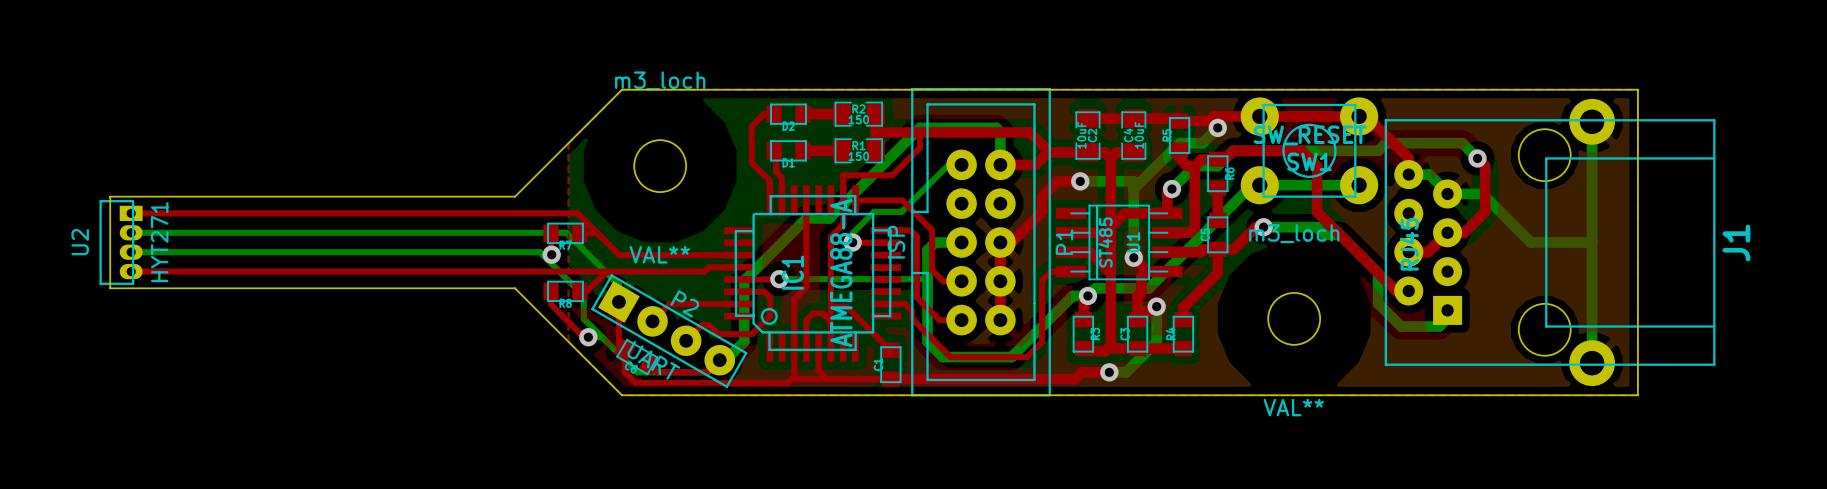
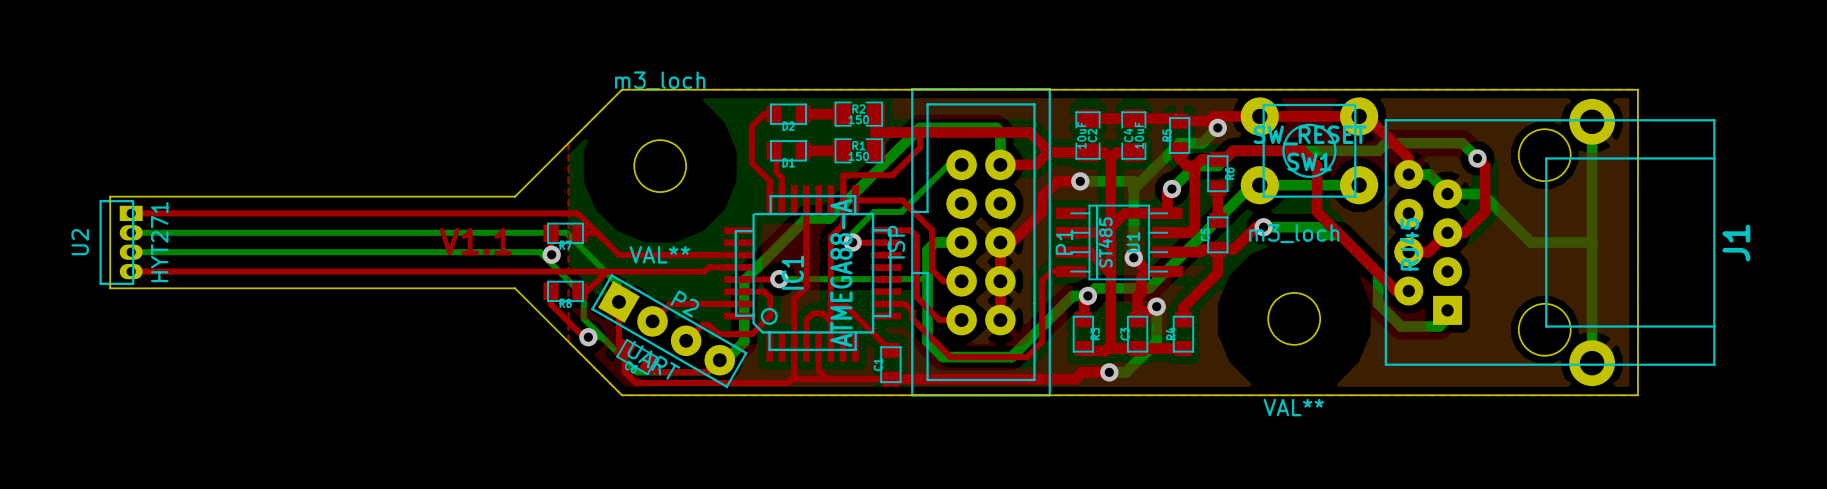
text: none -> V1.1 (475, 241)

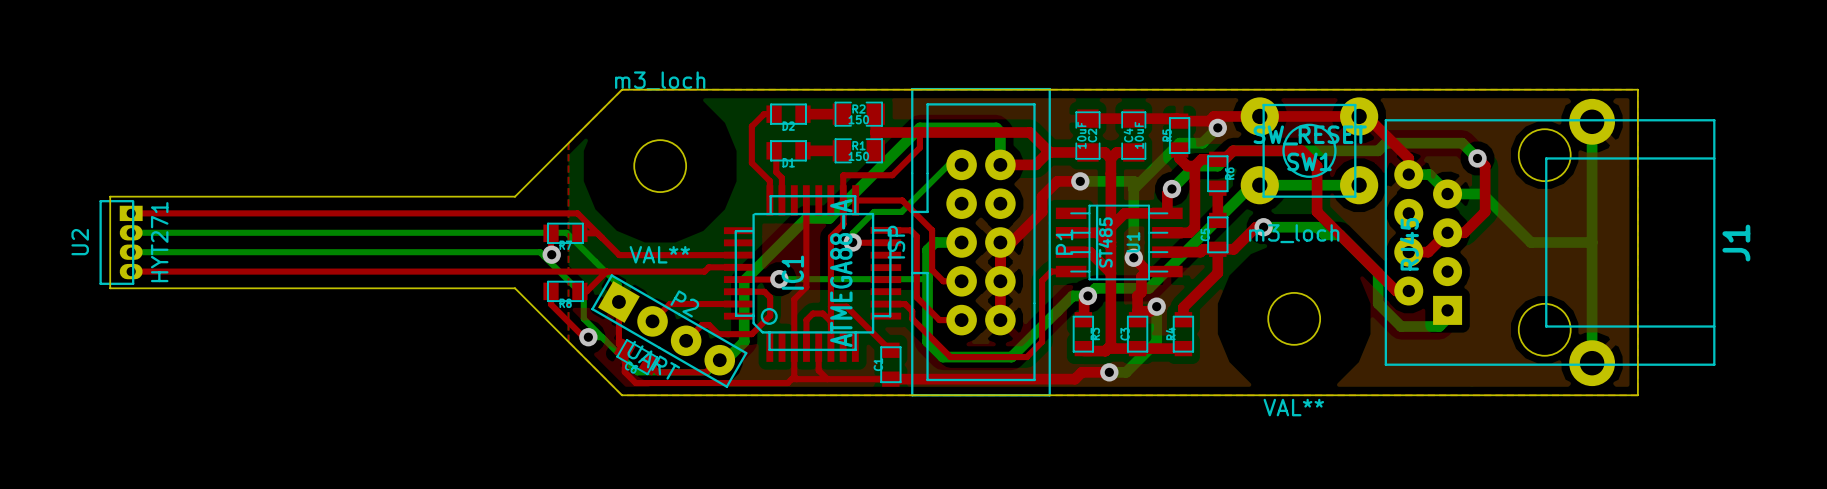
text: V1.1 (475, 241) -> none

